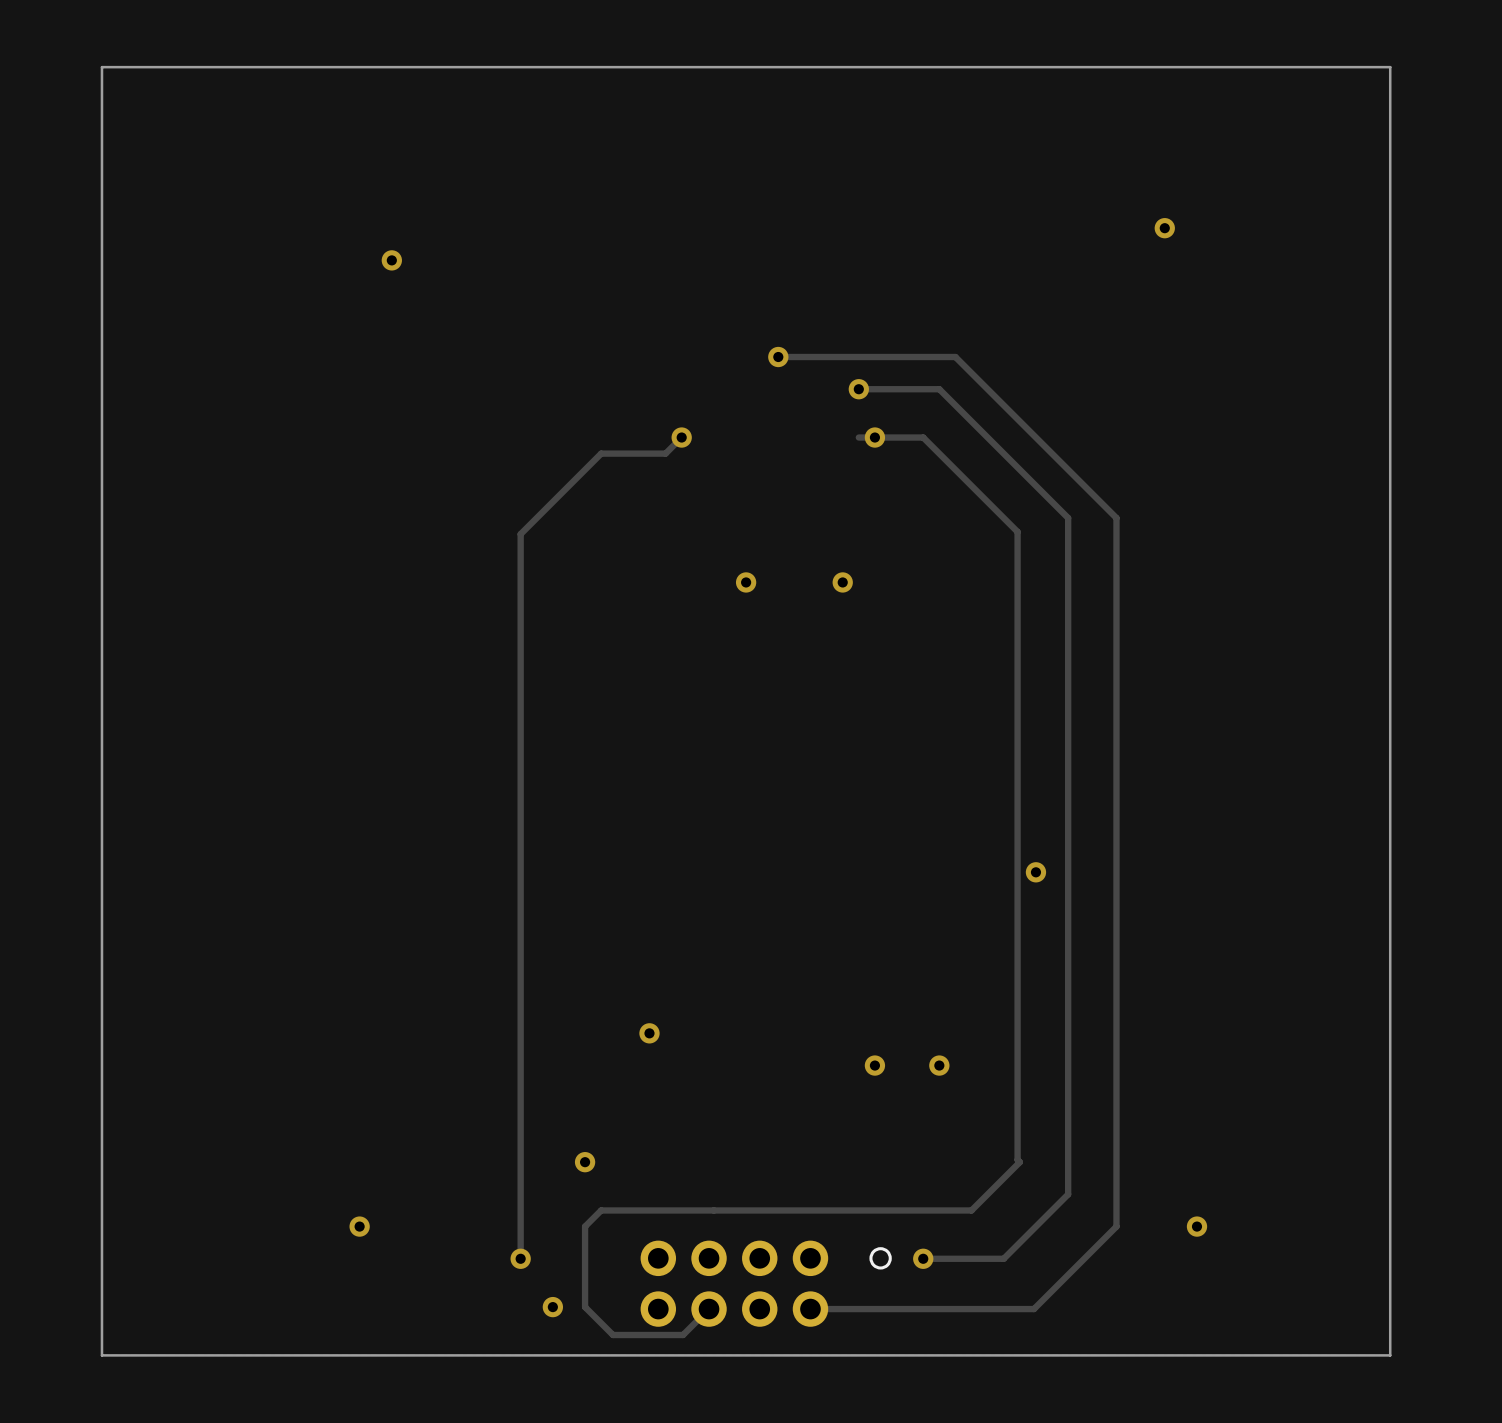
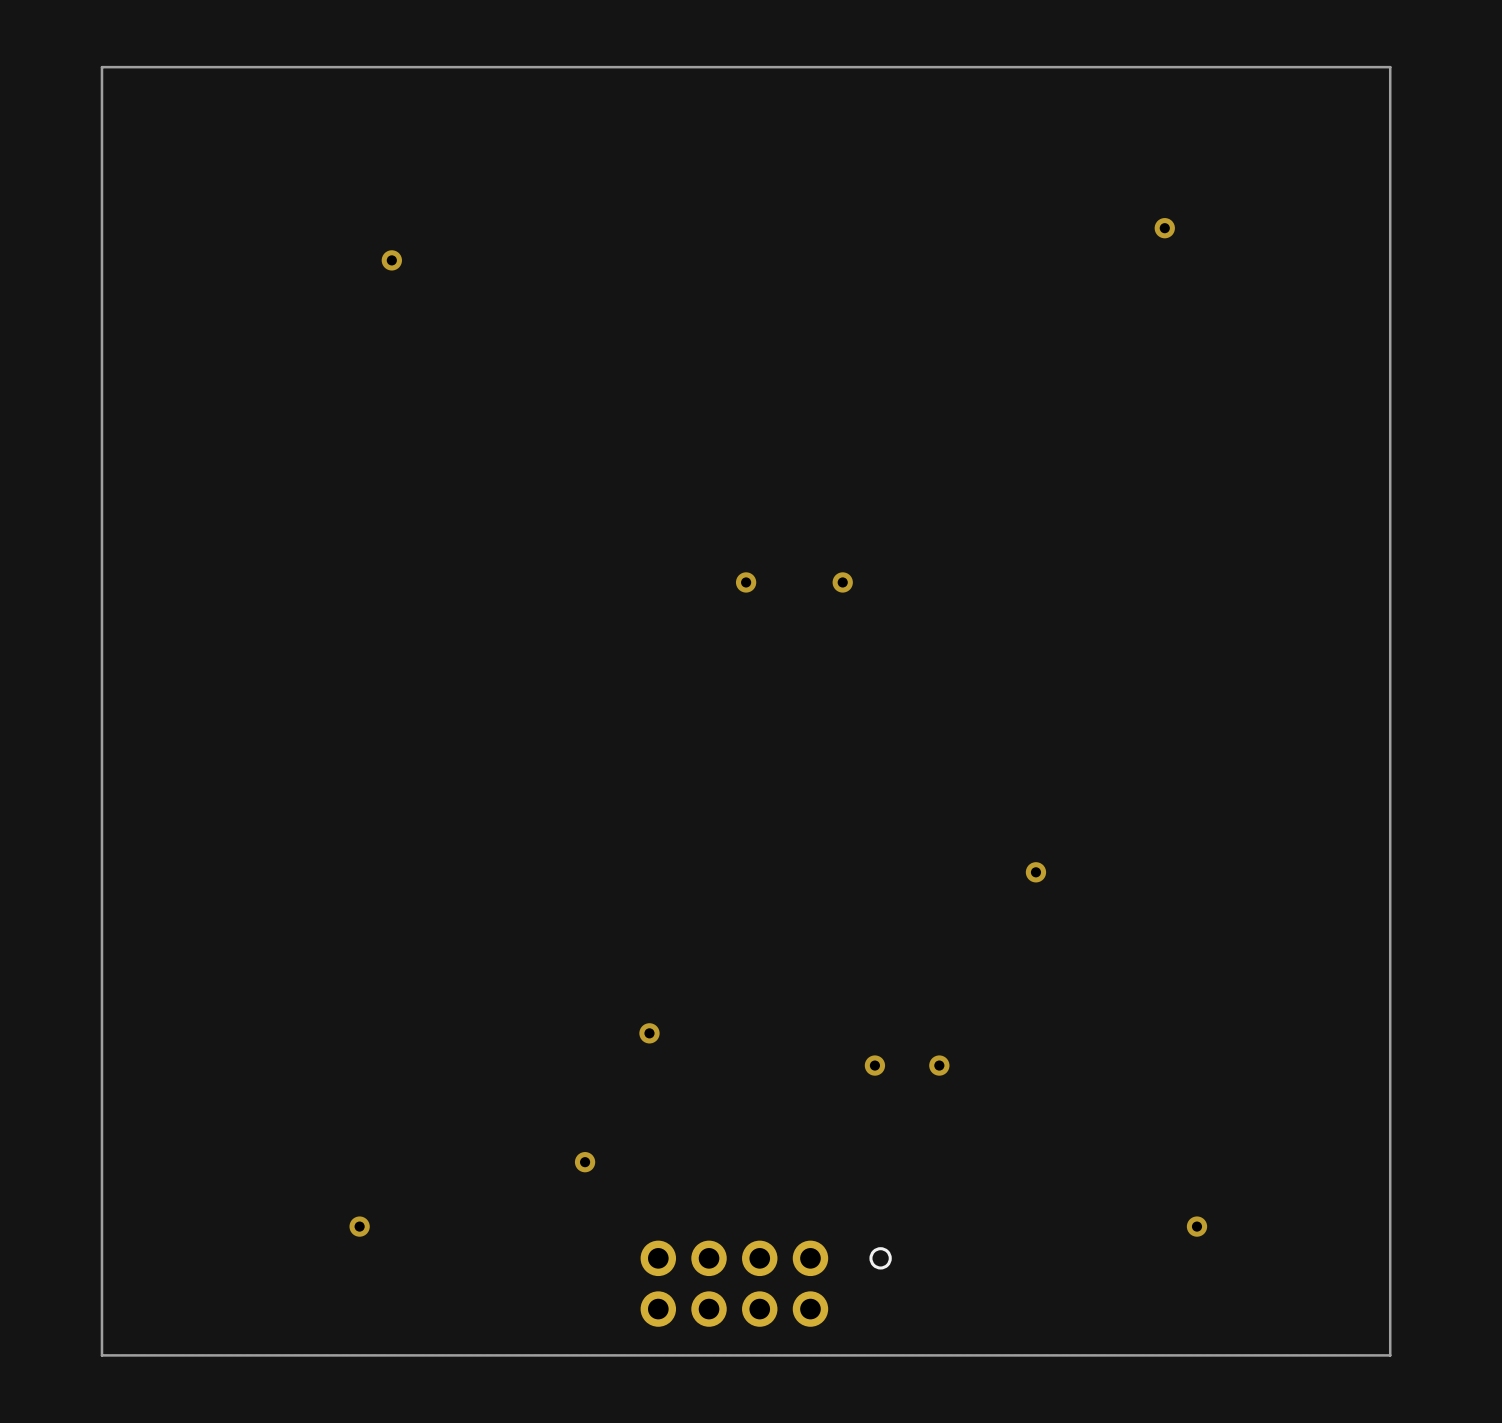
track: (778, 357) (955, 357) (1116, 518) (1116, 1226) (1034, 1309) (810, 1309) -> none
via: (778, 357) -> none
track: (858, 389) (939, 389) (1068, 518) (1068, 1194) (1003, 1258) (923, 1258) -> none
via: (858, 389) -> none
track: (681, 437) (665, 453) (601, 453) (520, 534) (520, 1258) -> none
via: (681, 437) -> none
track: (858, 437) (923, 437) (1017, 531) (1017, 1159) (1019, 1162) (971, 1210) (601, 1210) (585, 1226) (585, 1307) (612, 1335) (683, 1335) (709, 1309) -> none
via: (874, 437) -> none
via: (520, 1258) -> none
via: (923, 1258) -> none
via: (552, 1307) -> none

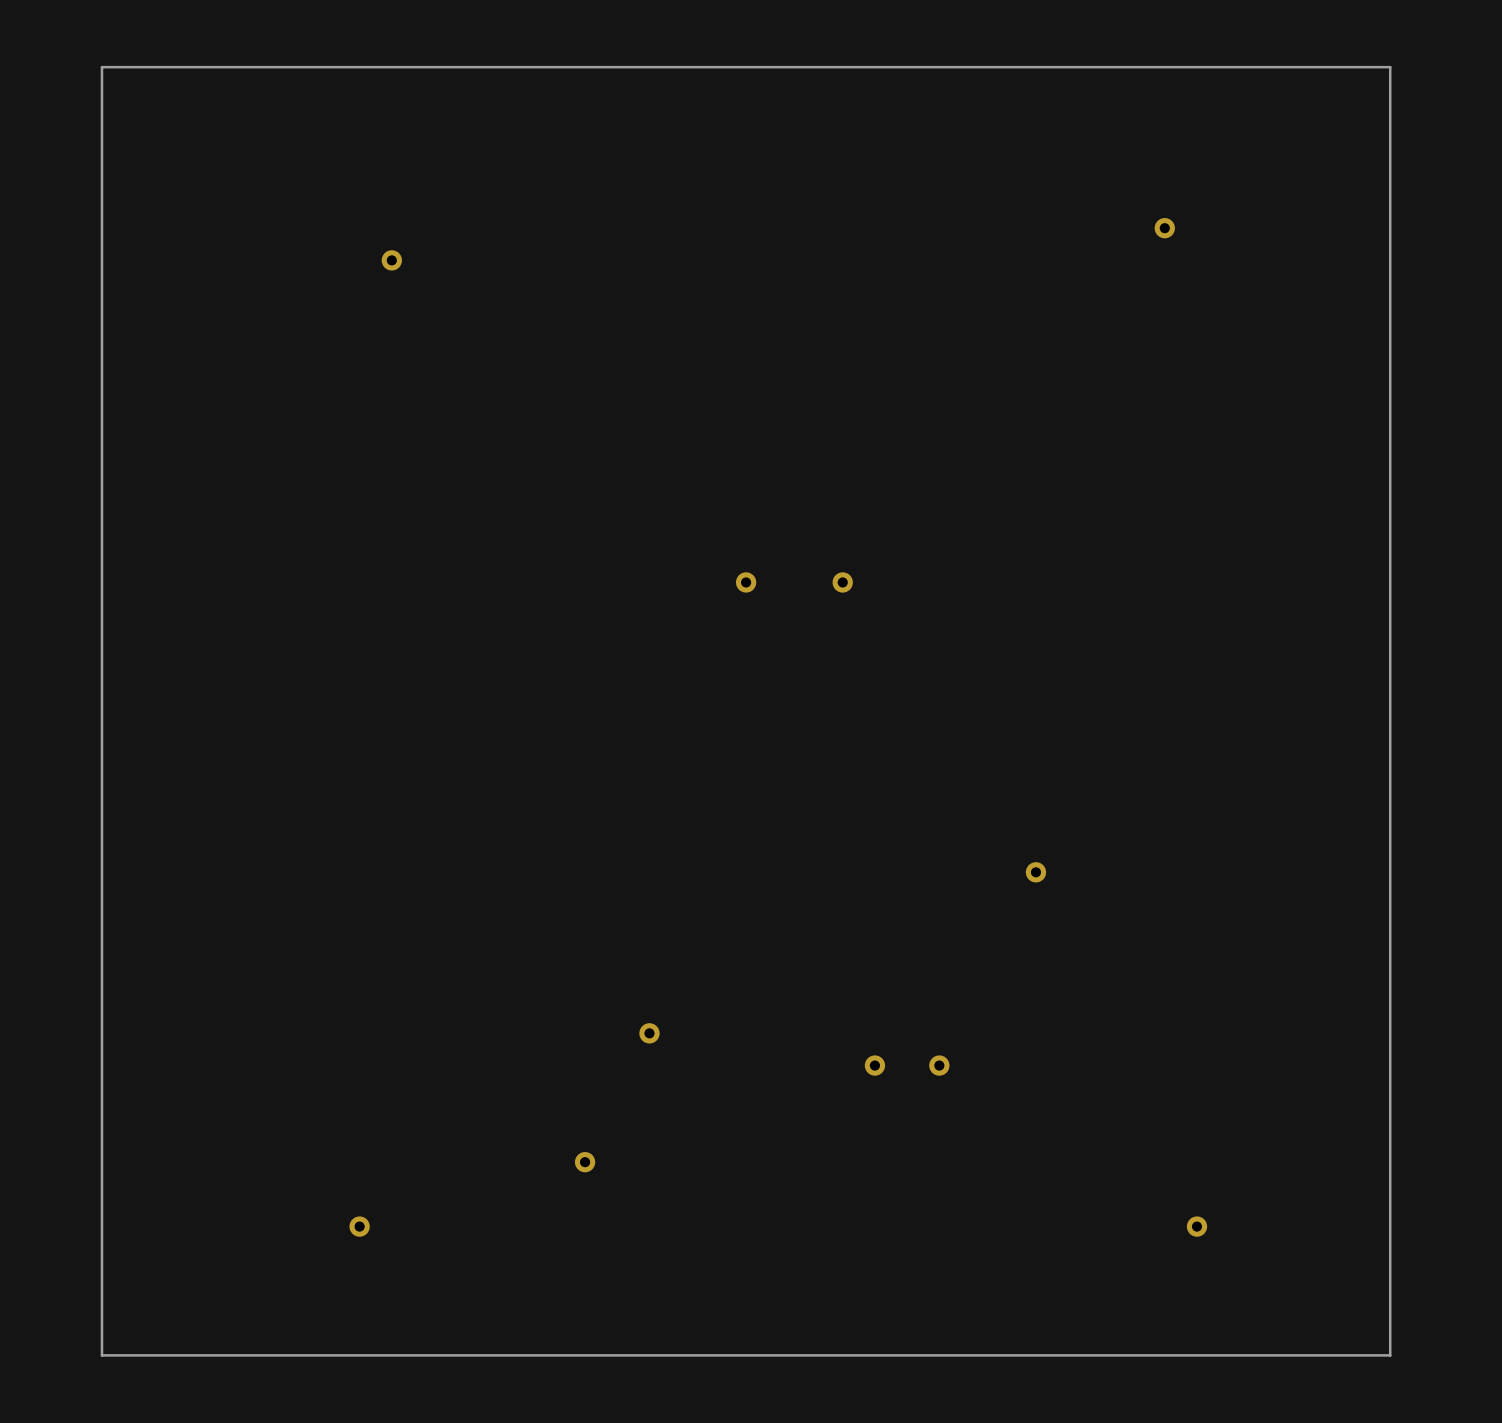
part: (766, 1283) -> none

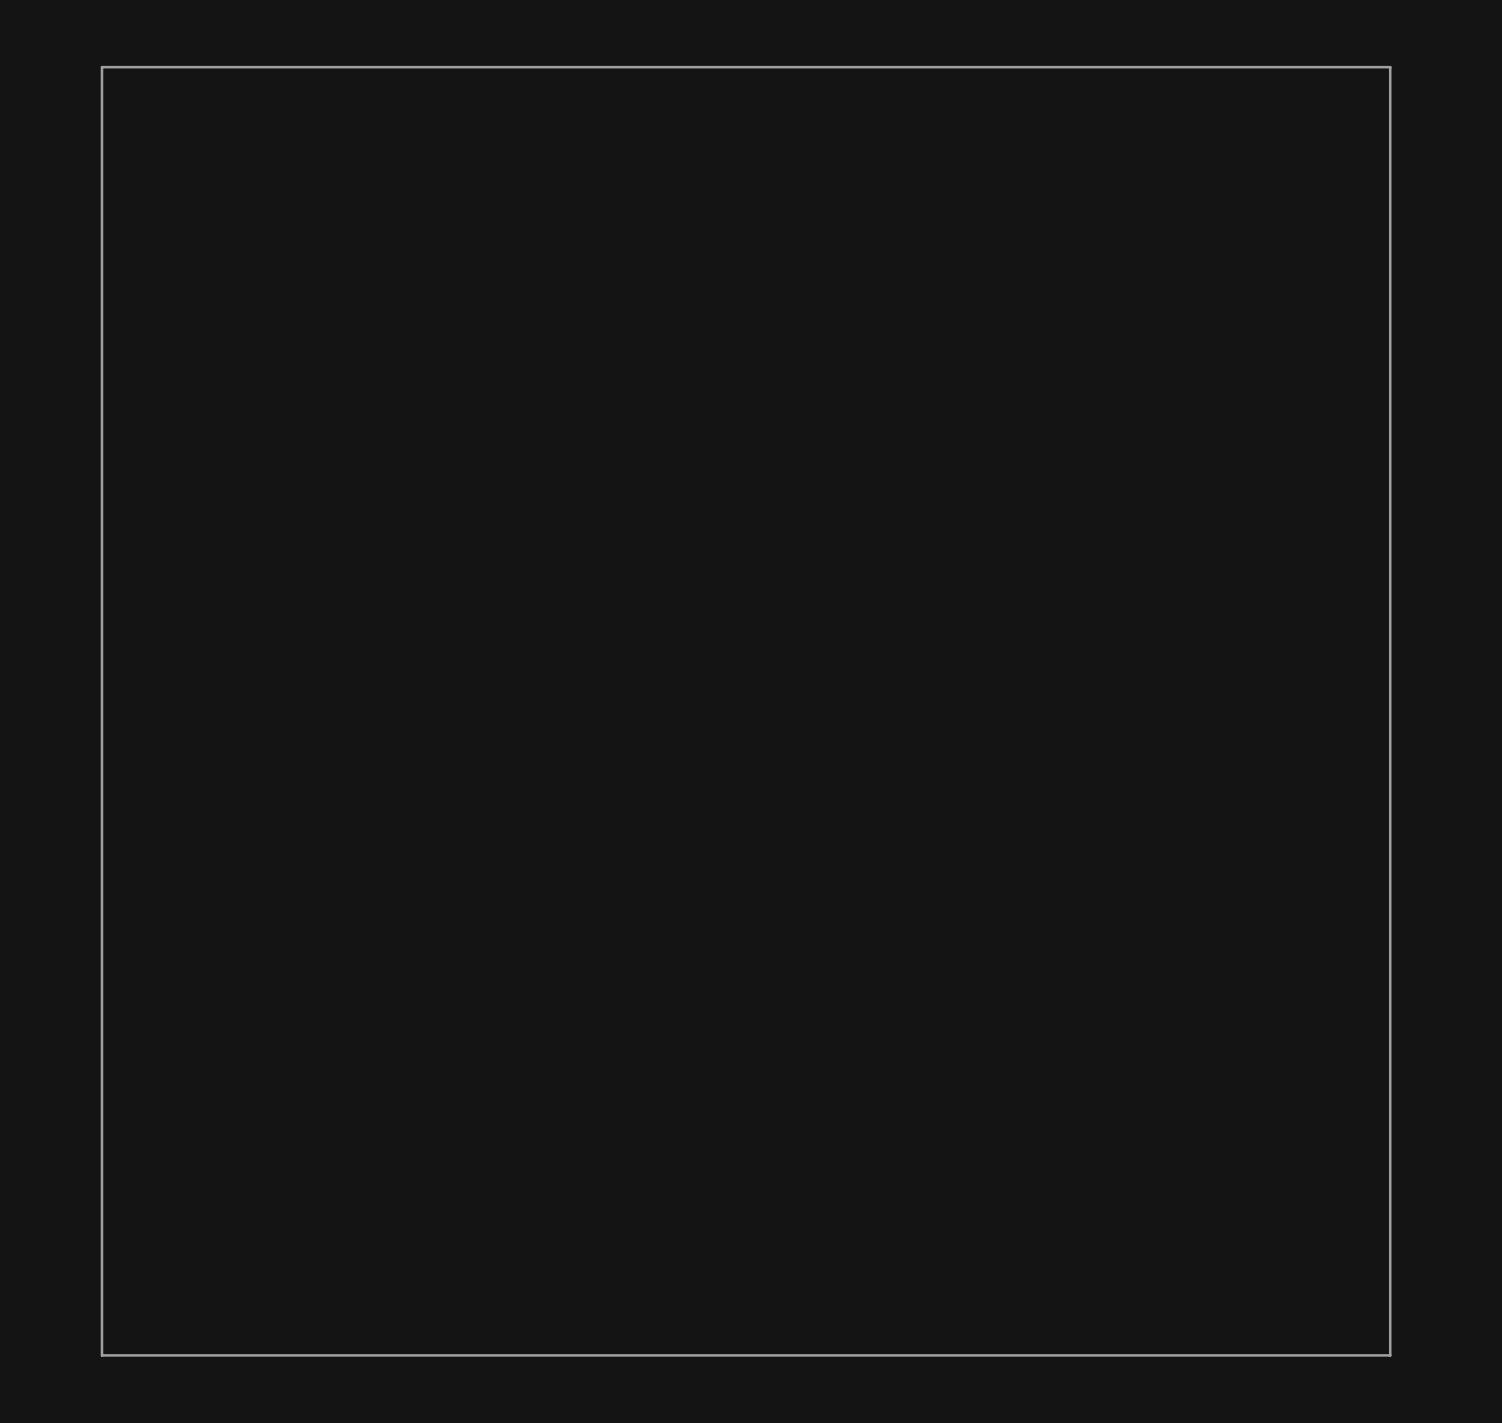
via: (1164, 228) -> none
via: (391, 260) -> none
via: (746, 582) -> none
via: (842, 582) -> none
via: (1035, 872) -> none
via: (649, 1033) -> none
via: (874, 1065) -> none
via: (939, 1065) -> none
via: (585, 1162) -> none
via: (359, 1226) -> none
via: (1196, 1226) -> none

